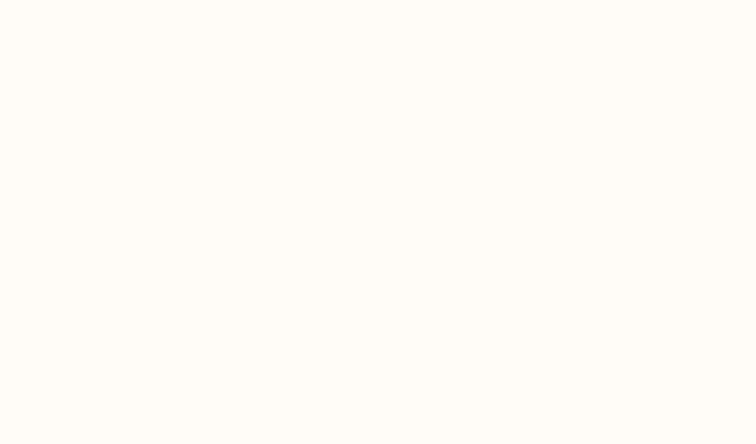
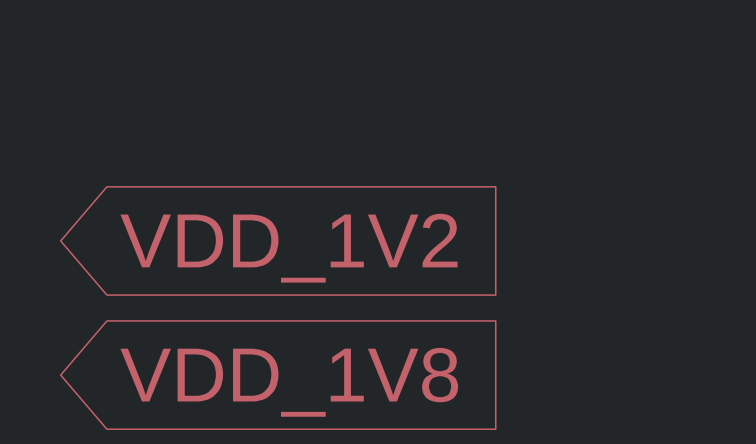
global label: none -> VDD_1V2 (289, 248)
global label: none -> VDD_1V8 (289, 382)

